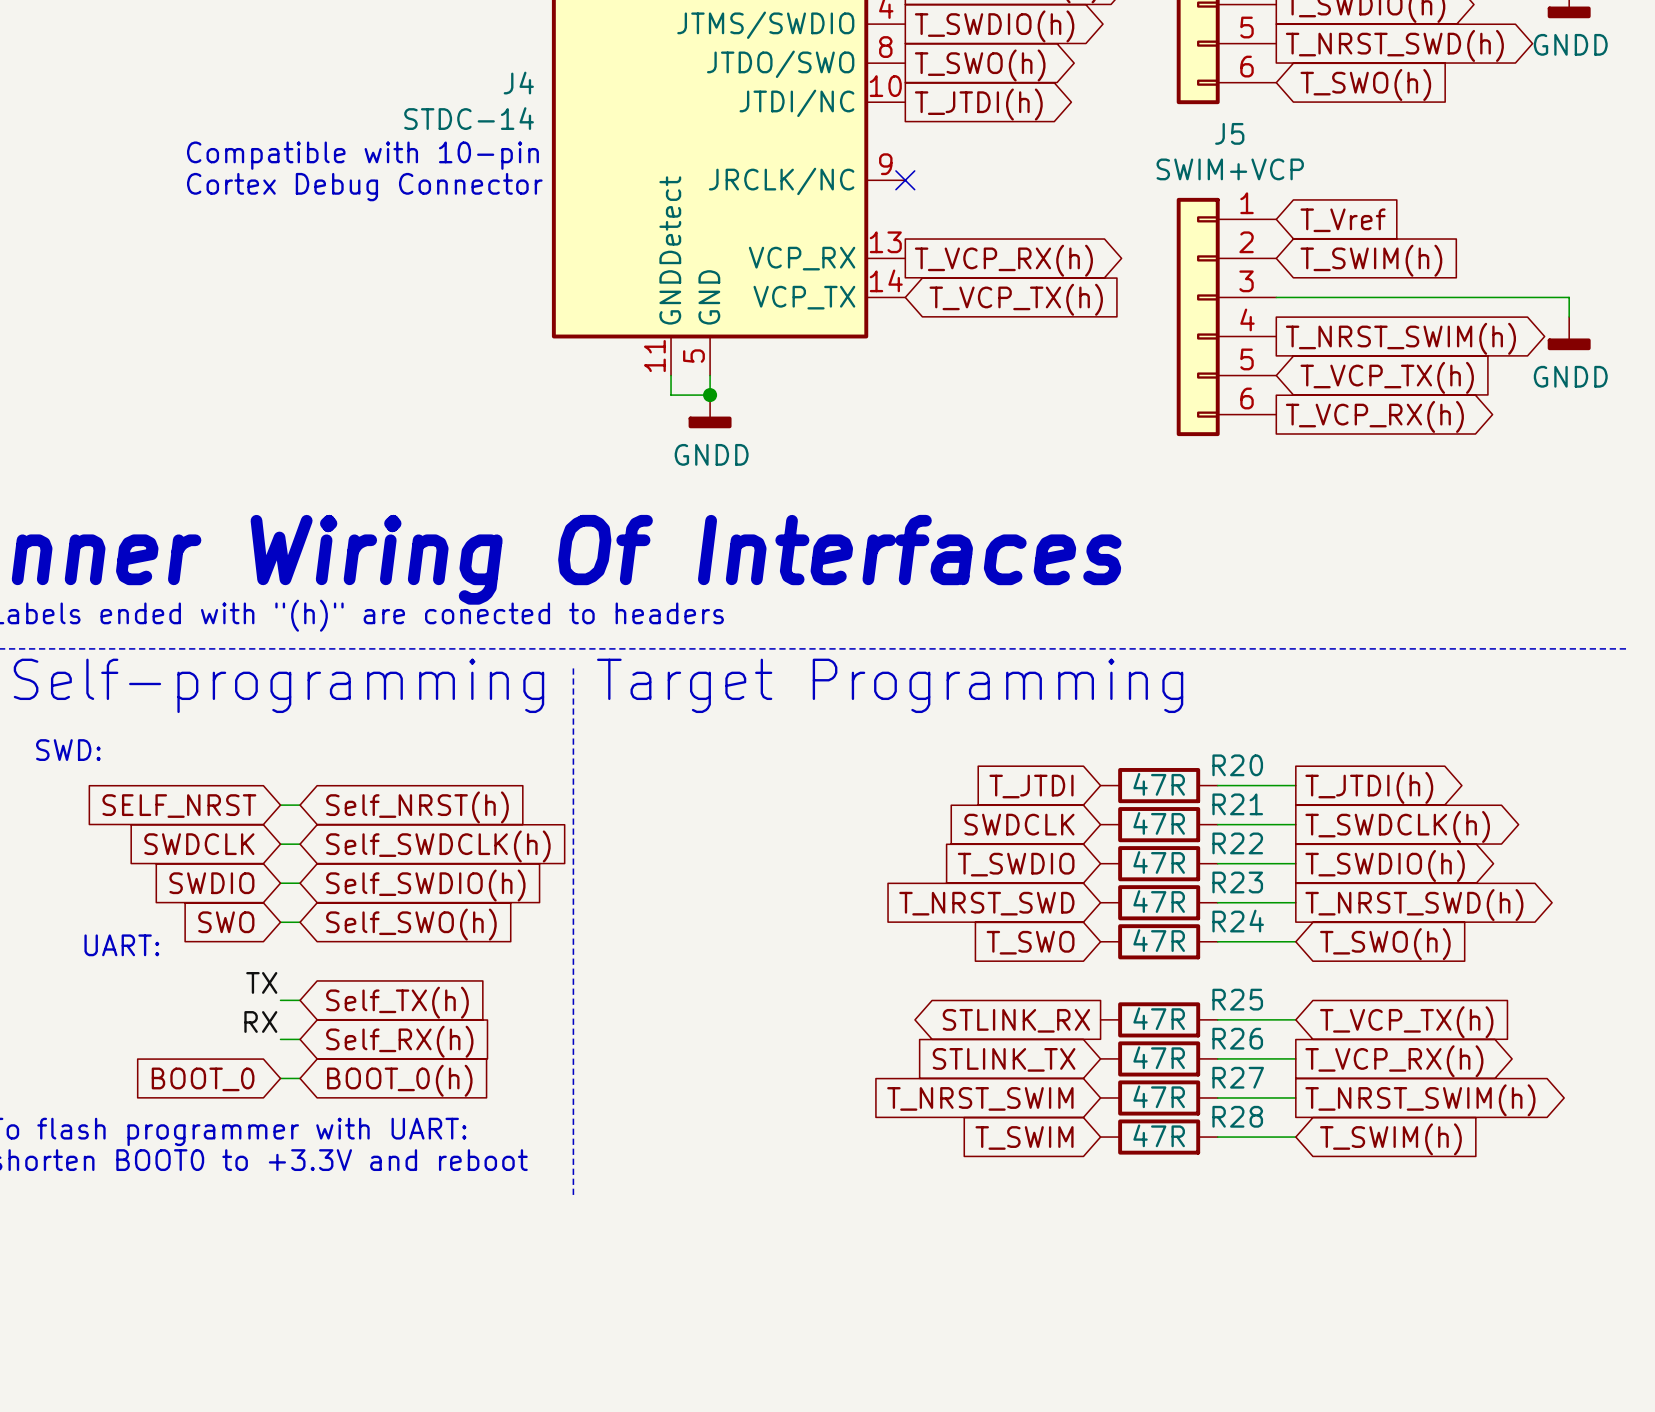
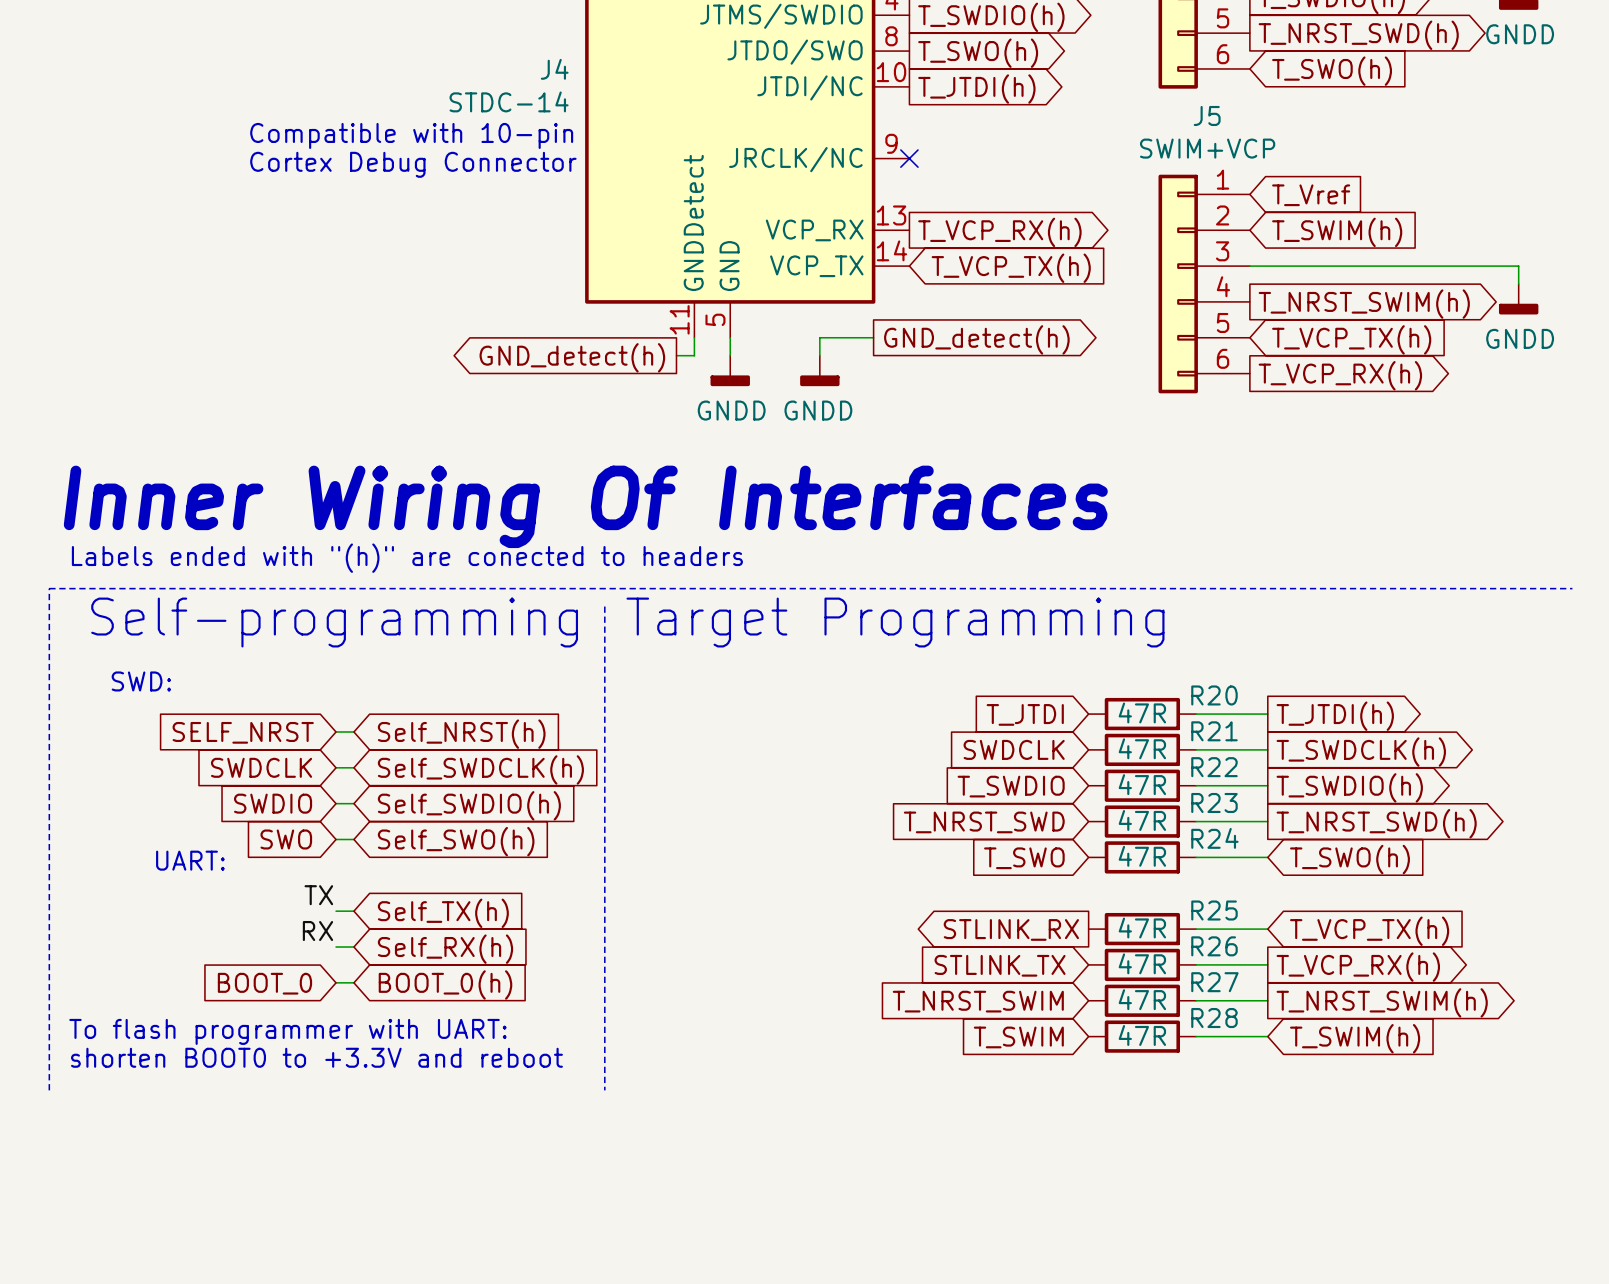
wire: none -> (873, 337) (819, 337) (819, 355)
global label: none -> GND_detect(h) (976, 339)
wire: (671, 395) (710, 395) -> (694, 355) (676, 355)
junction: (710, 395) -> none
global label: none -> GND_detect(h) (572, 357)
power symbol: none -> GNDD (819, 370)

